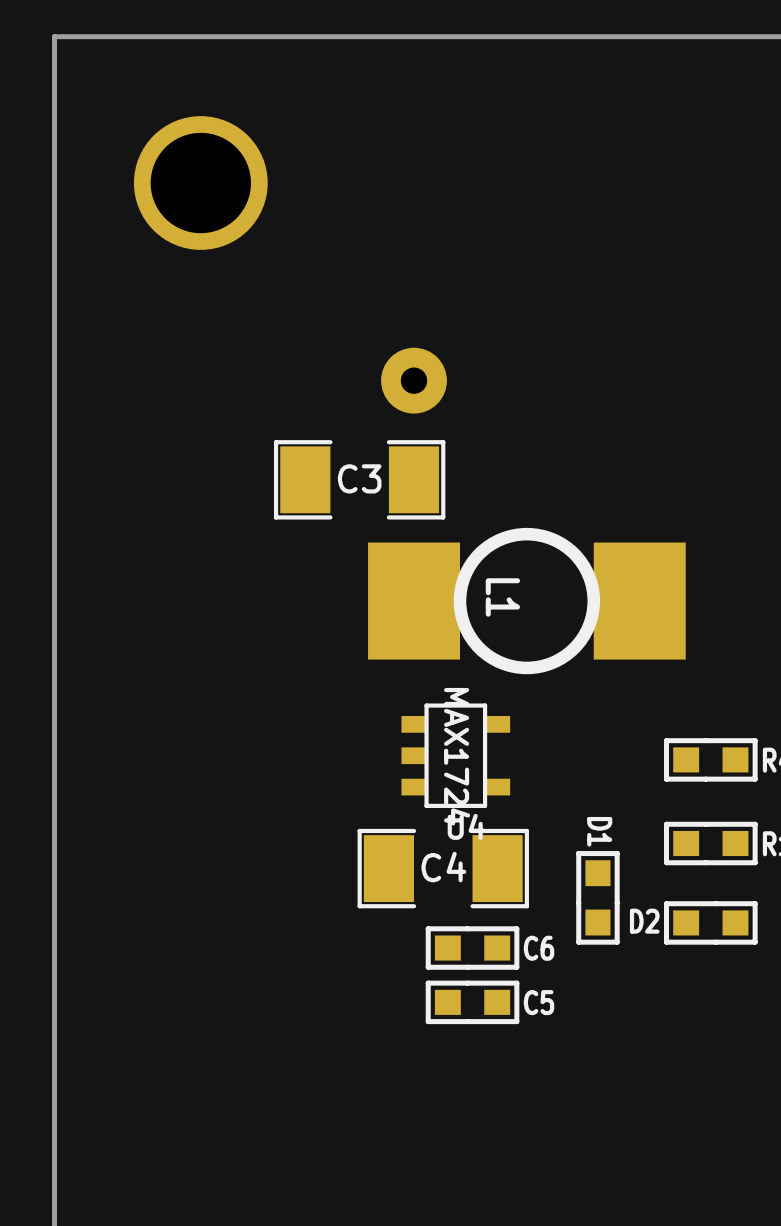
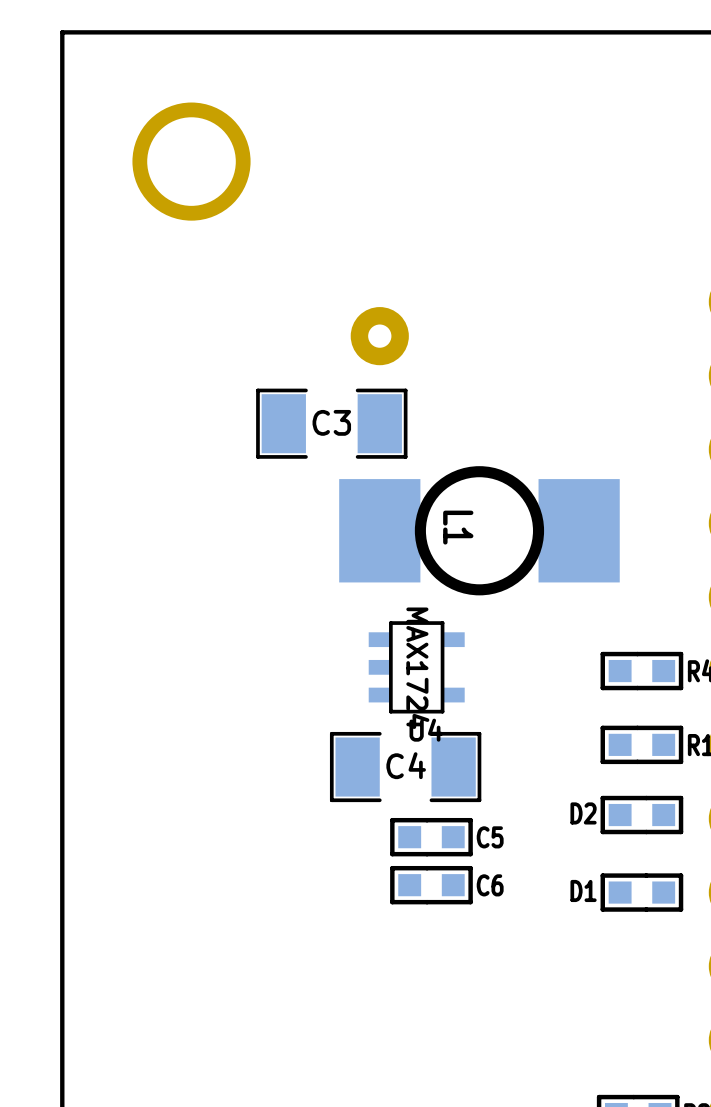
D1 rotation: 0° (597, 897) -> 90° counterclockwise (641, 892)
D1 position: (597, 897) -> (641, 892)
C6 name: C6 (539, 948) -> C5 (490, 837)
C5 name: C5 (539, 1002) -> C6 (490, 885)

